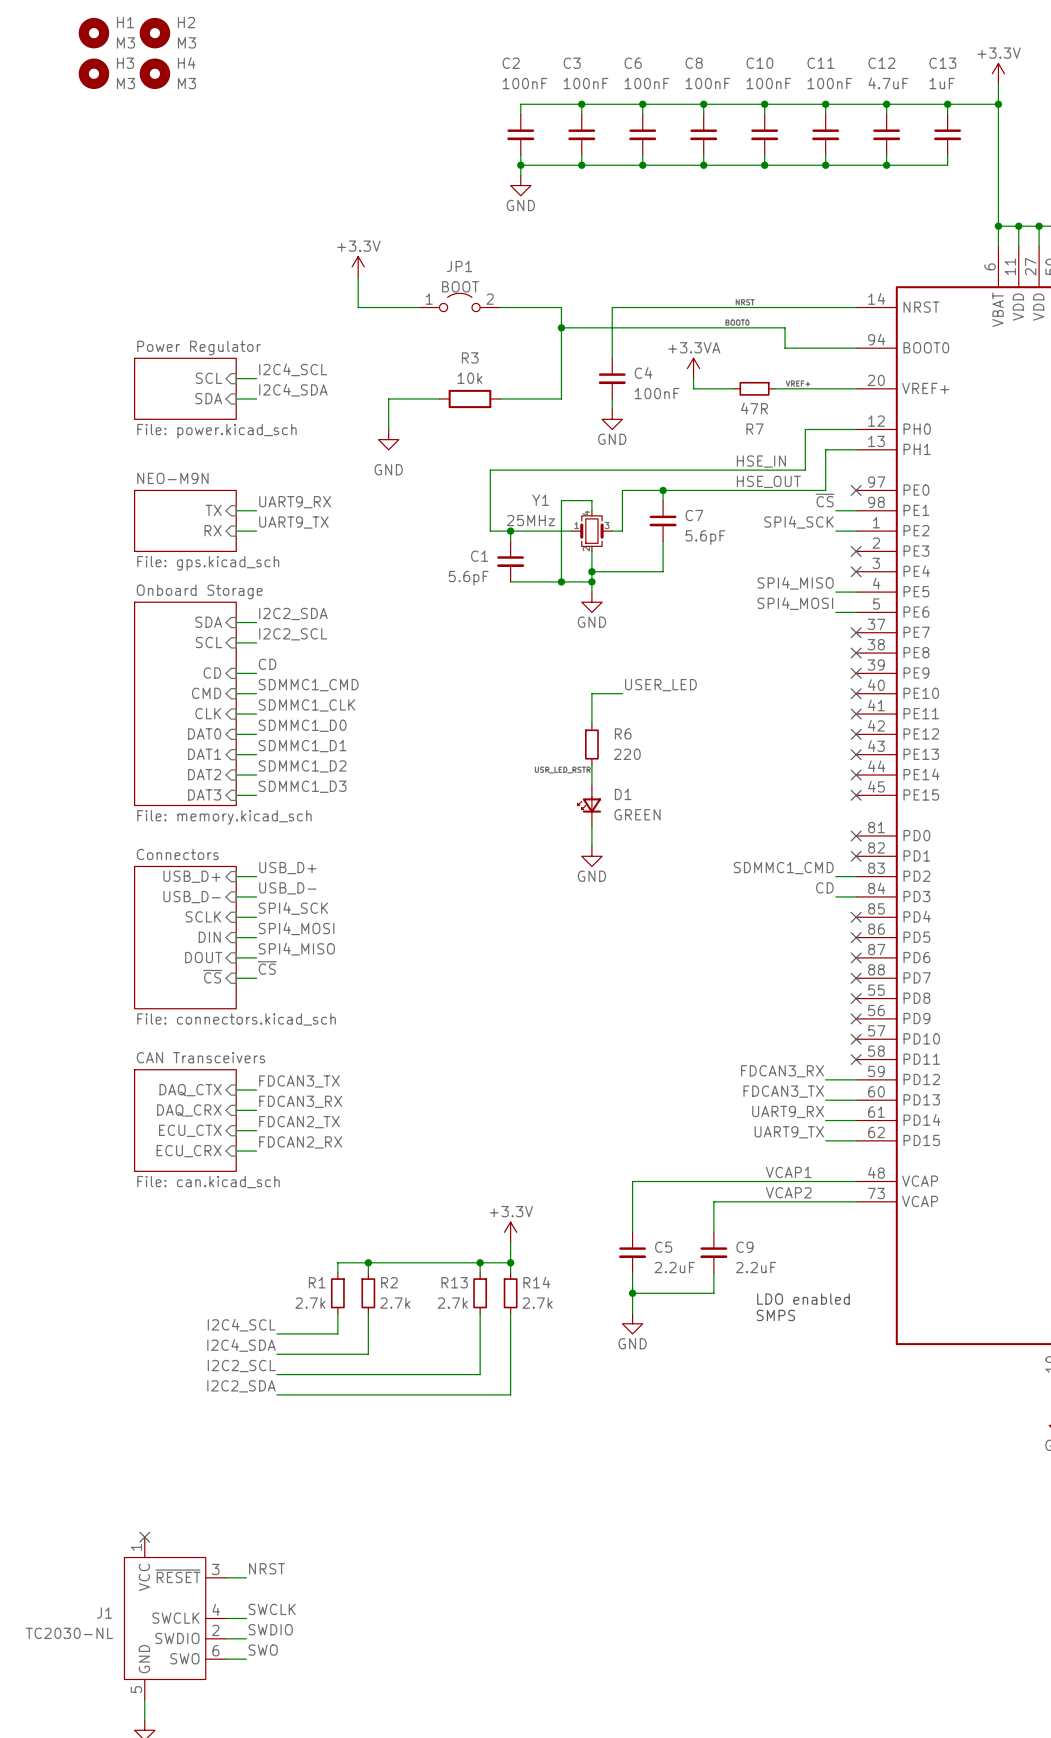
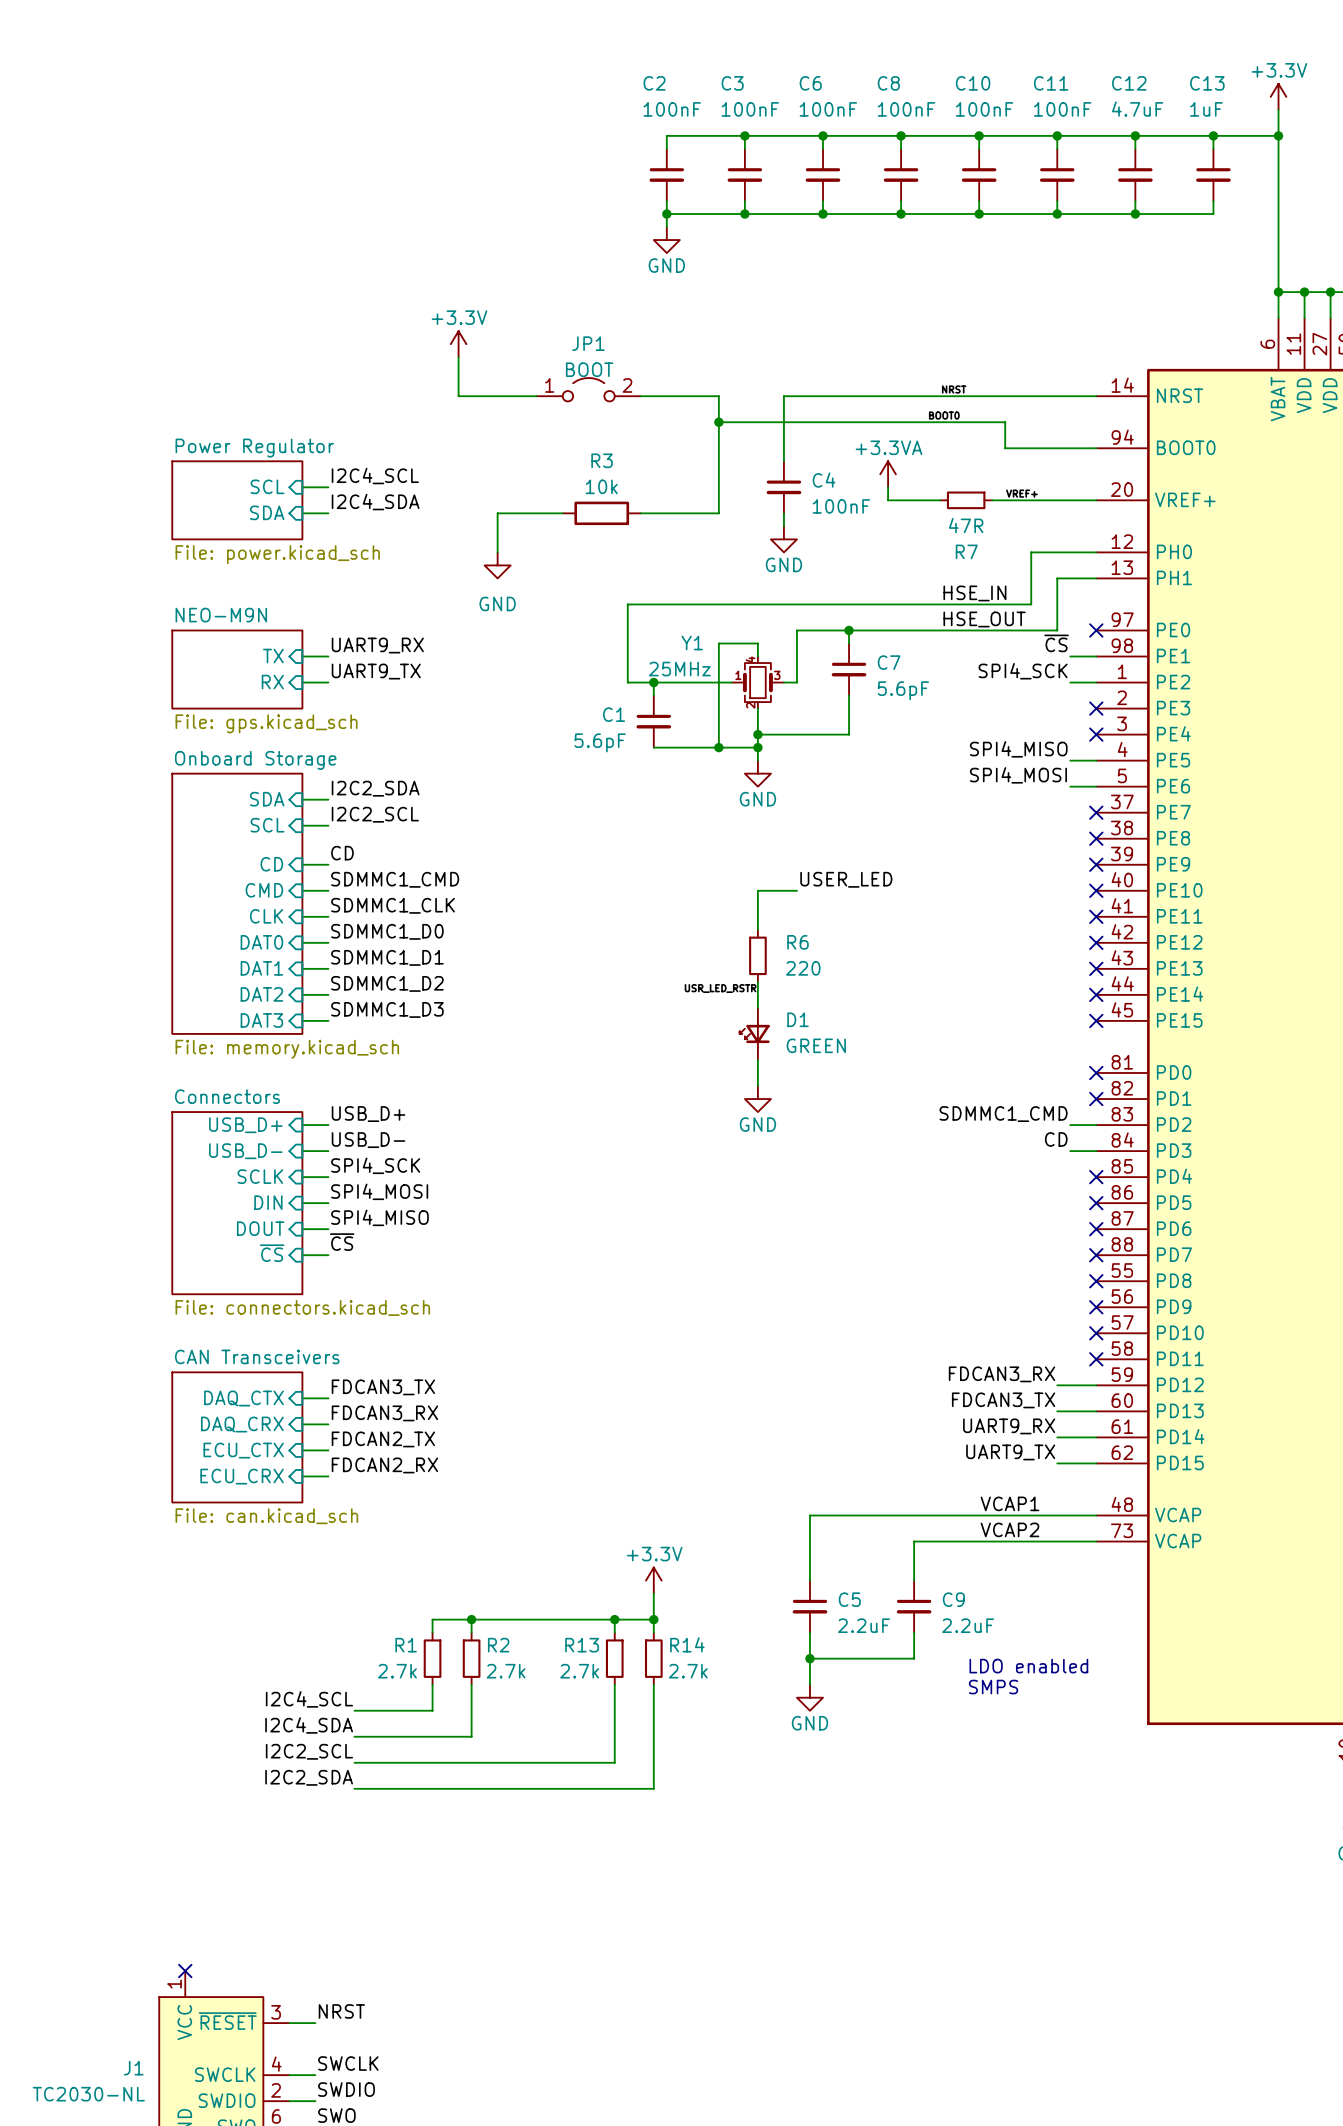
H1: M3 (93, 33) -> none
H2: M3 (154, 33) -> none
H3: M3 (93, 73) -> none
H4: M3 (154, 73) -> none

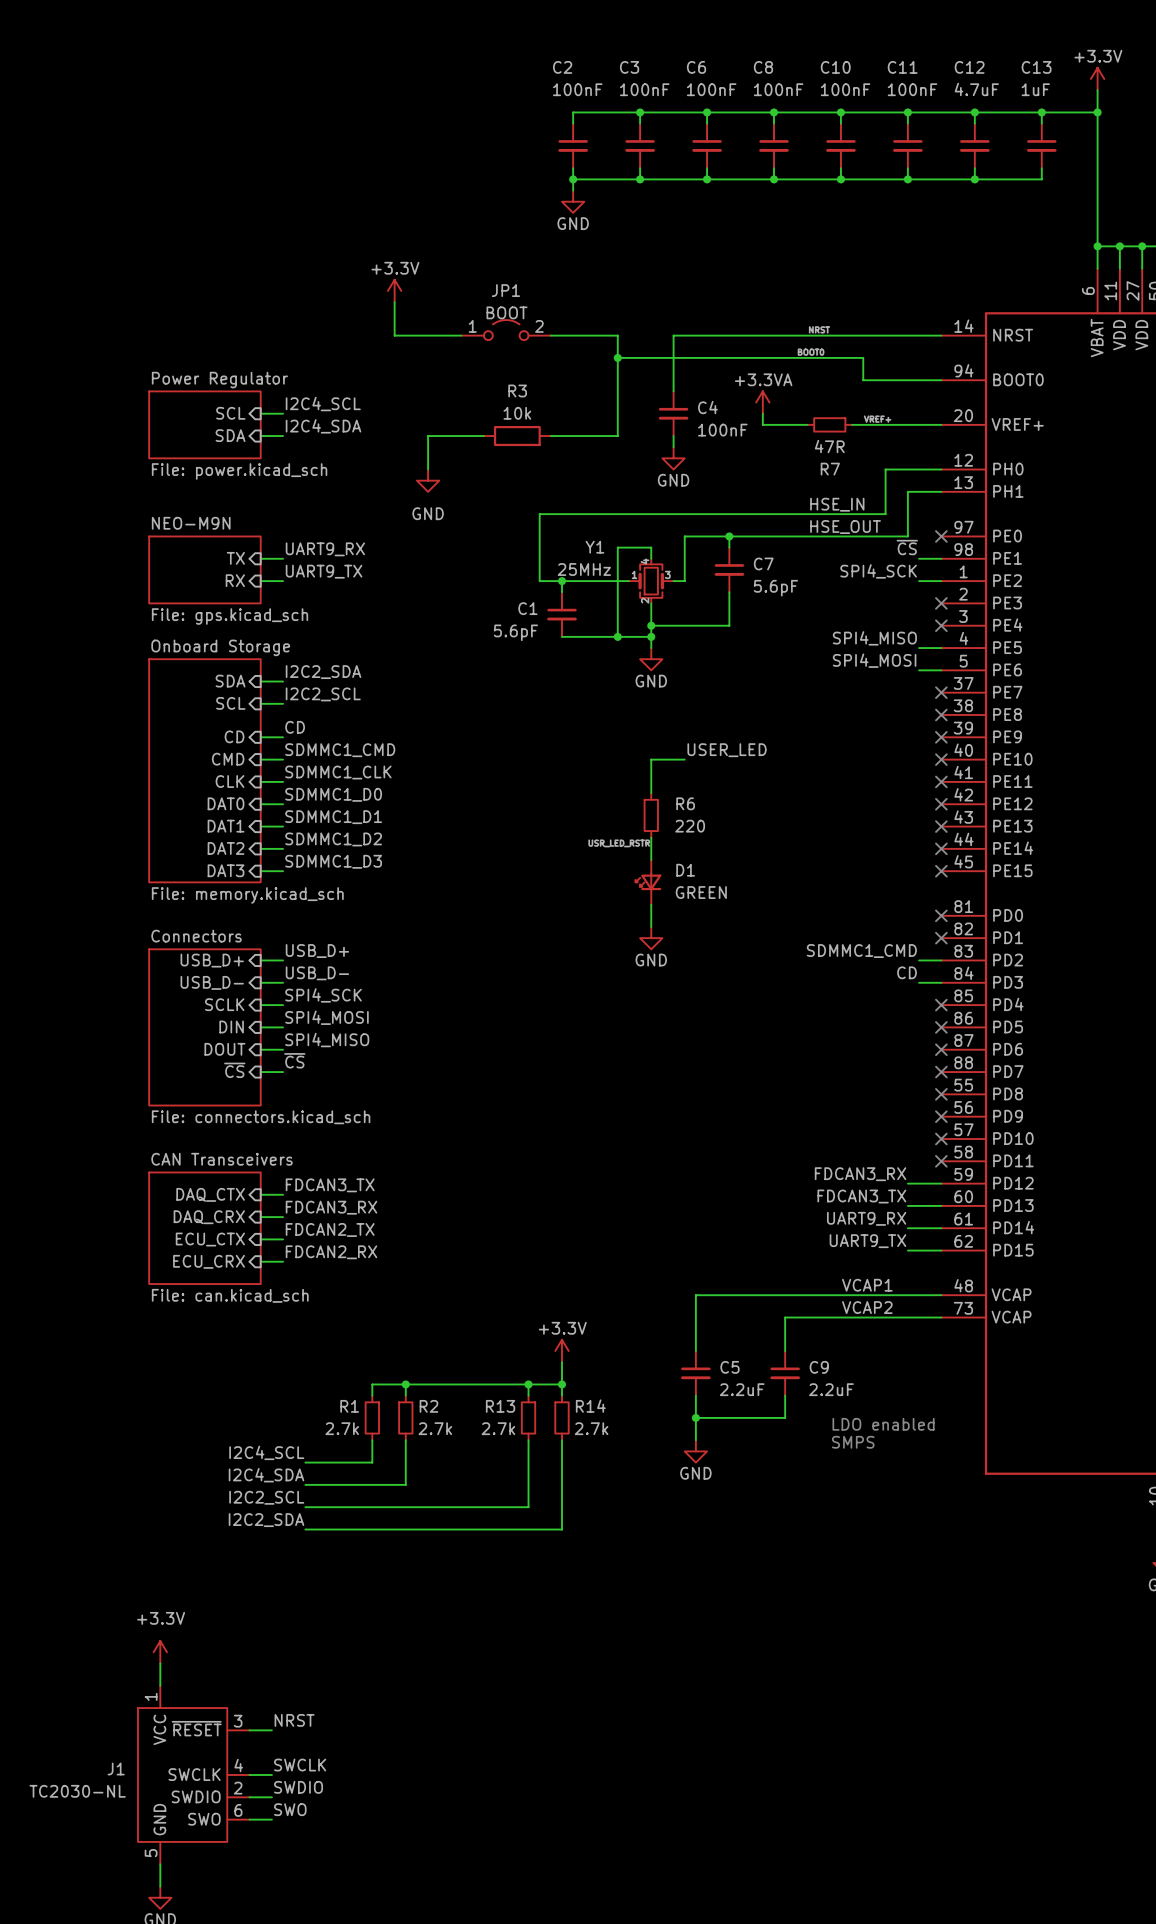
power symbol: none -> +3.3V (160, 1652)
wire: none -> (160, 1663) (160, 1685)
no-connect mark: (185, 1971) -> none

